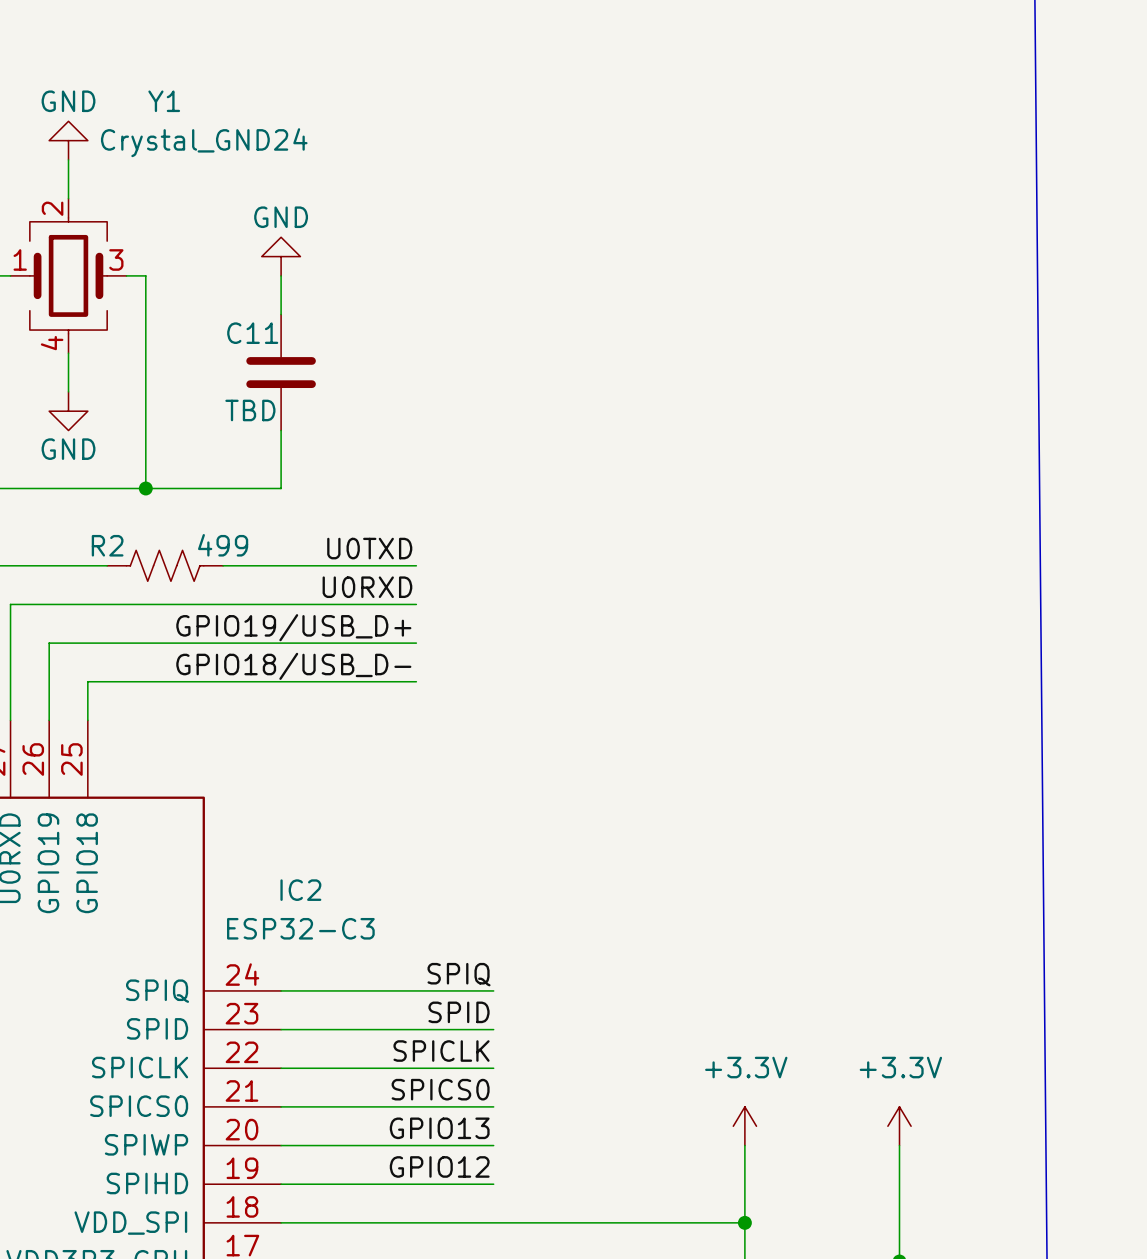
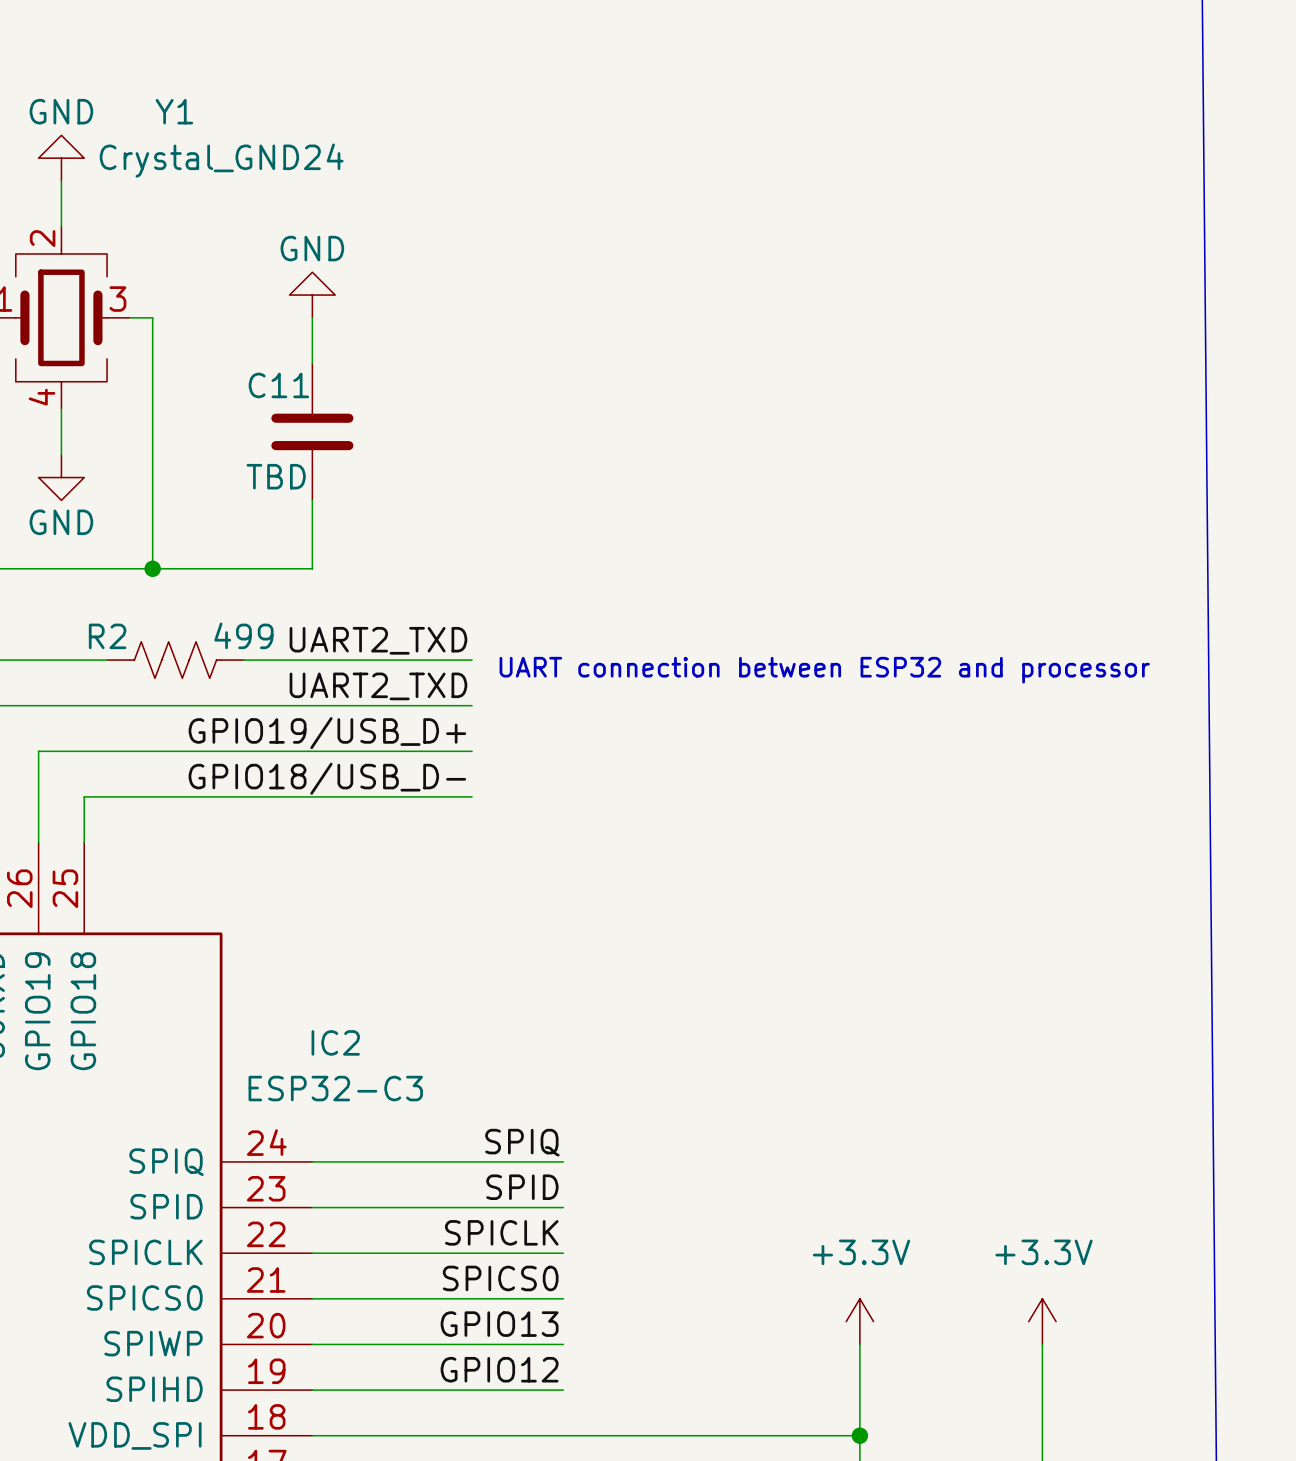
label: U0TXD (369, 548) -> UART2_TXD (378, 640)
text: none -> UART connection between ESP32 and processor (824, 670)
label: U0RXD (367, 587) -> UART2_TXD (378, 686)

